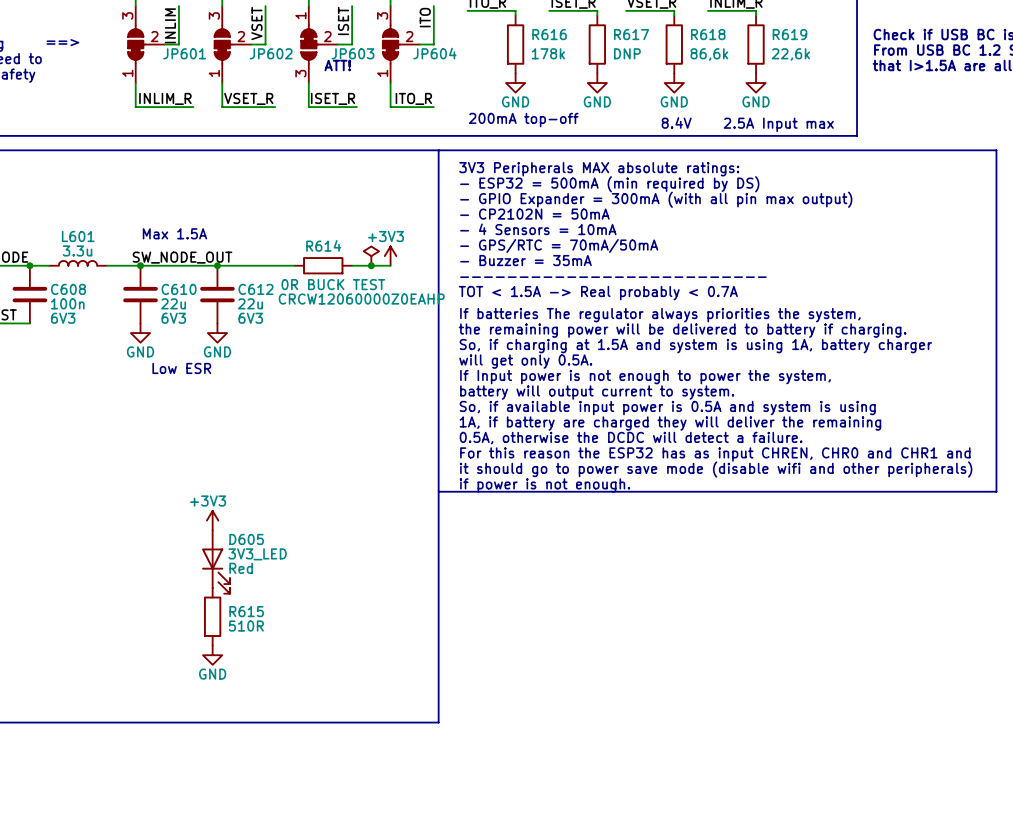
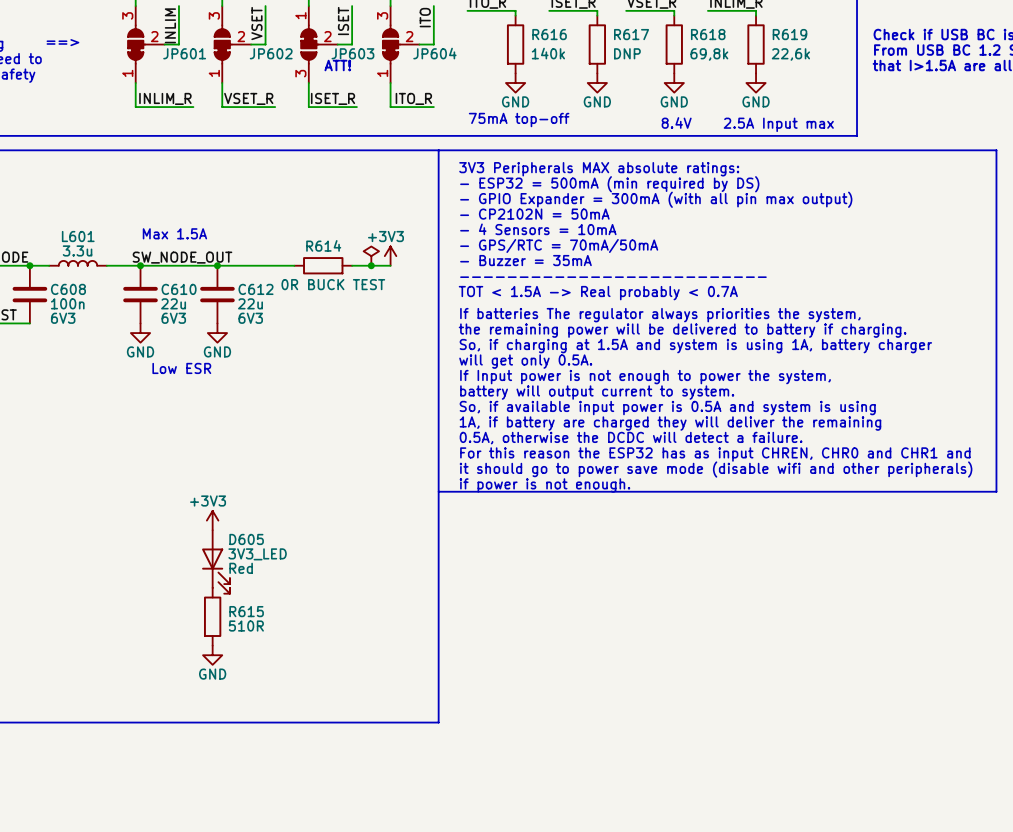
R616 value: 178k (548, 53) -> 140k (548, 53)
R618 value: 86,6k (709, 54) -> 69,8k (709, 54)
text: 200mA top-off (523, 120) -> 75mA top-off (519, 120)
R614 text: CRCW12060000Z0EAHP (361, 299) -> none

